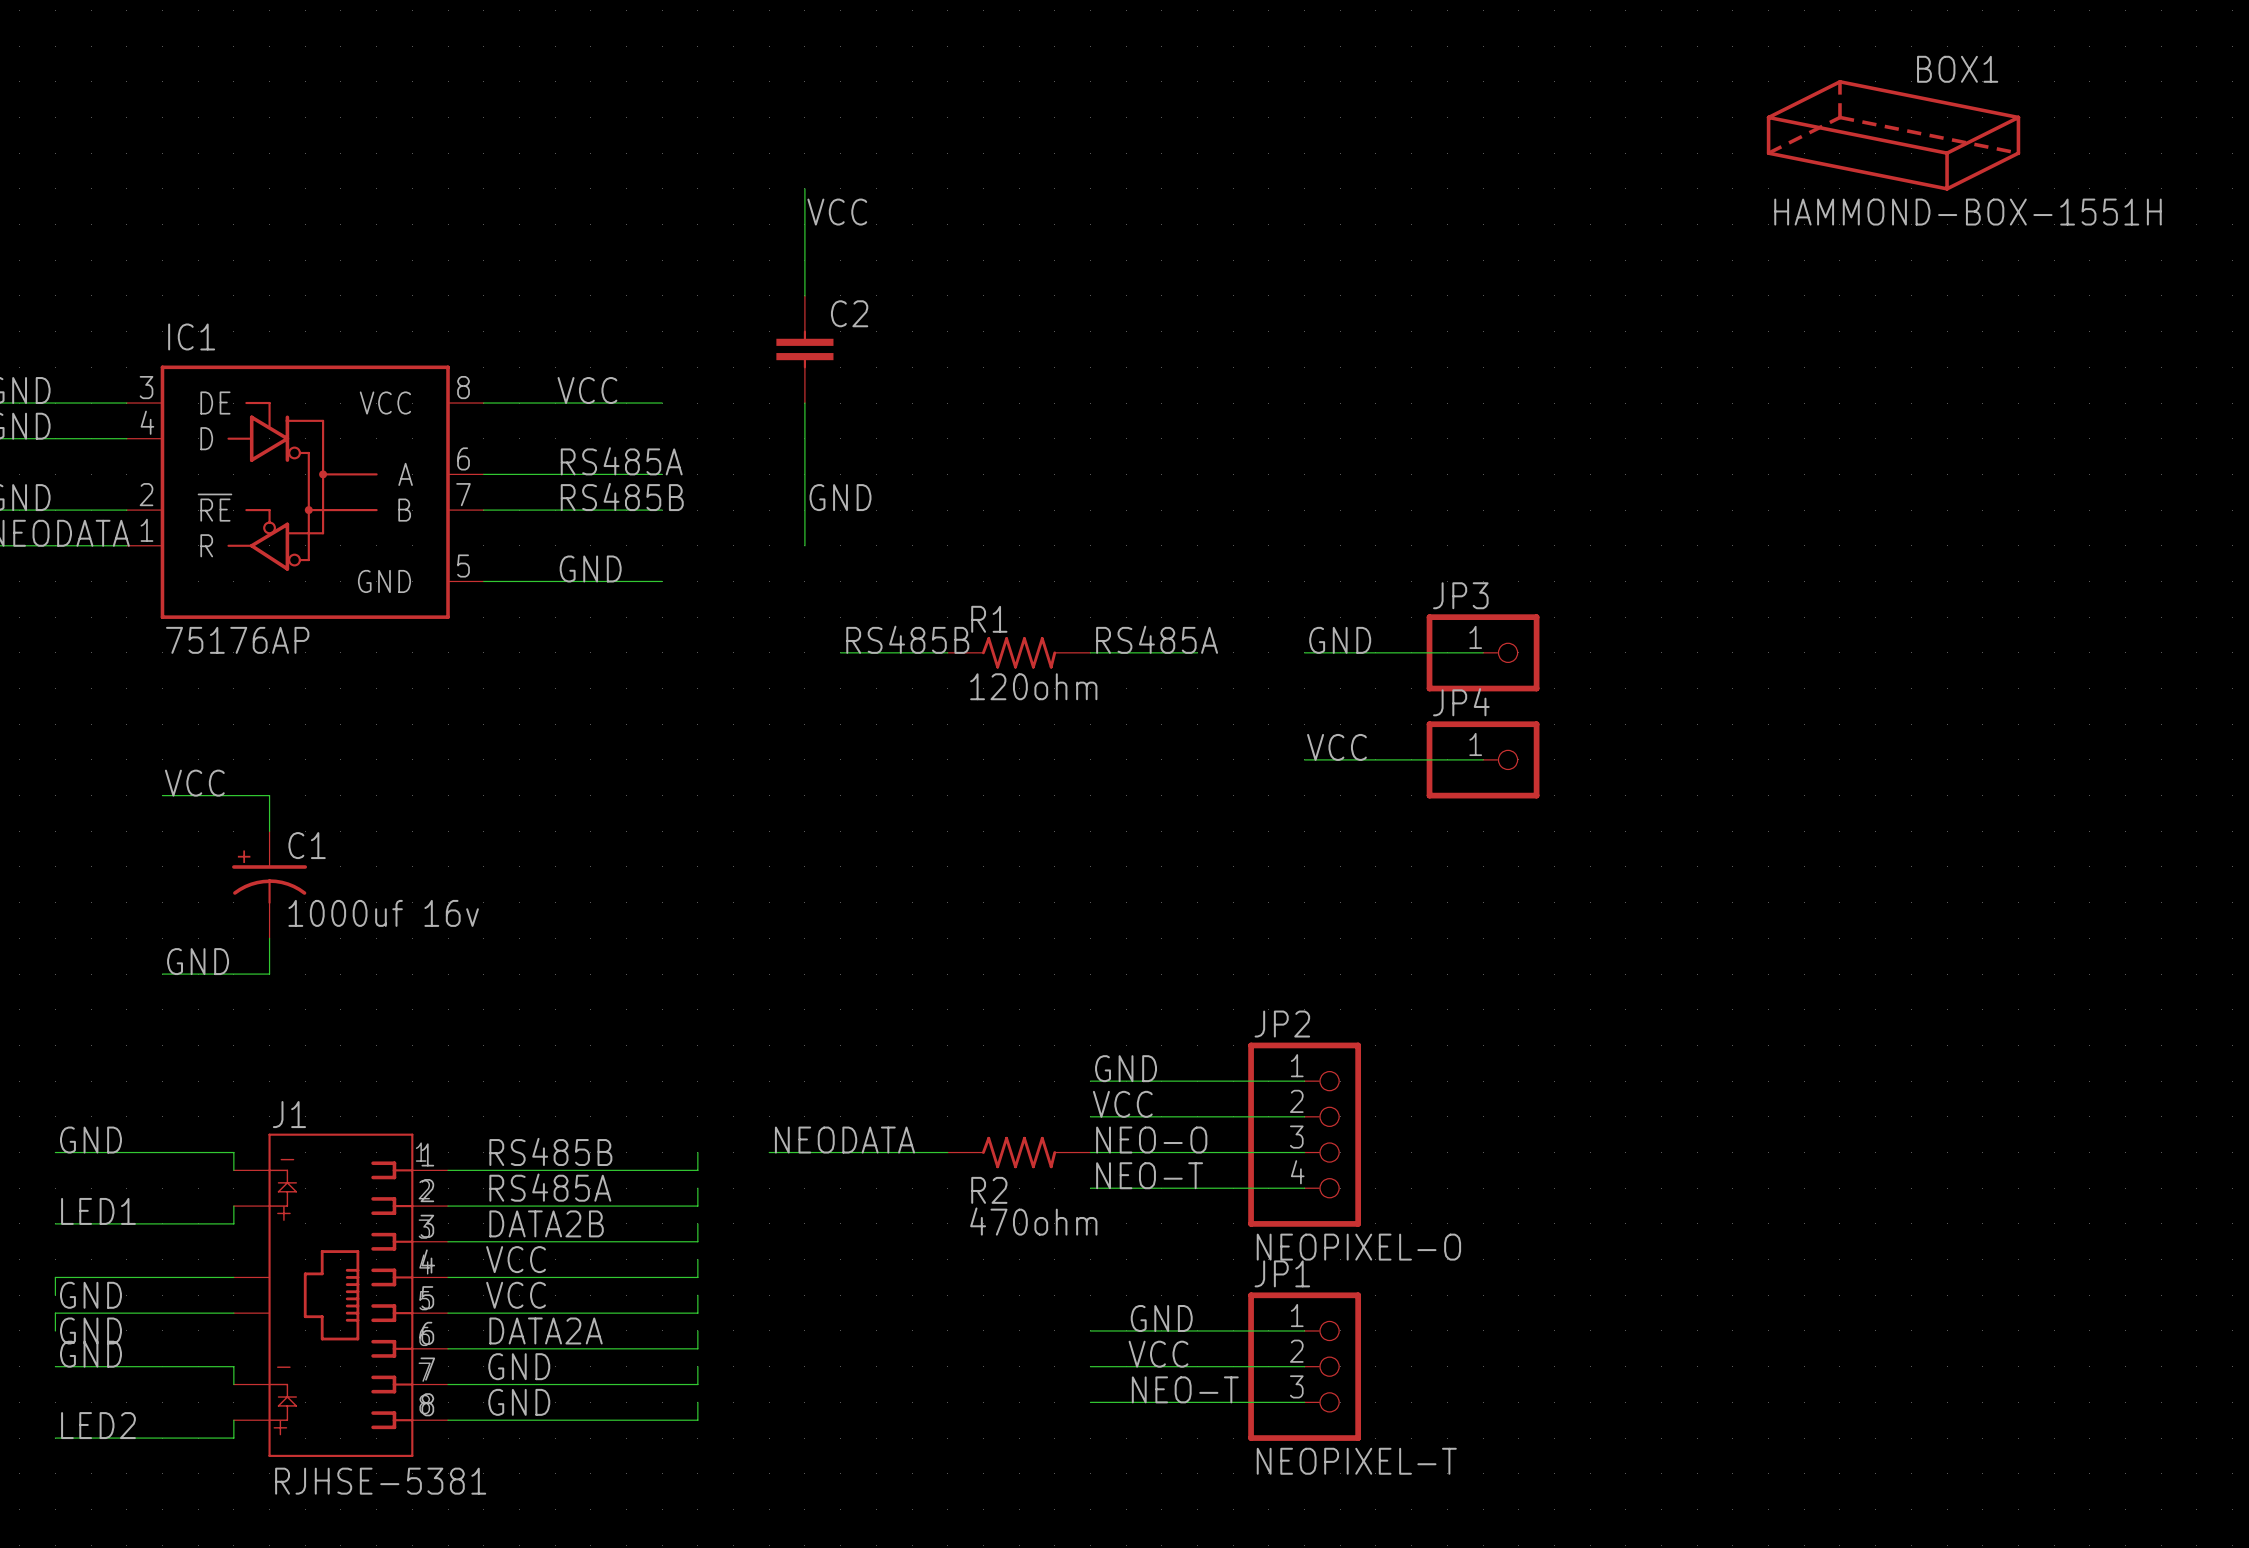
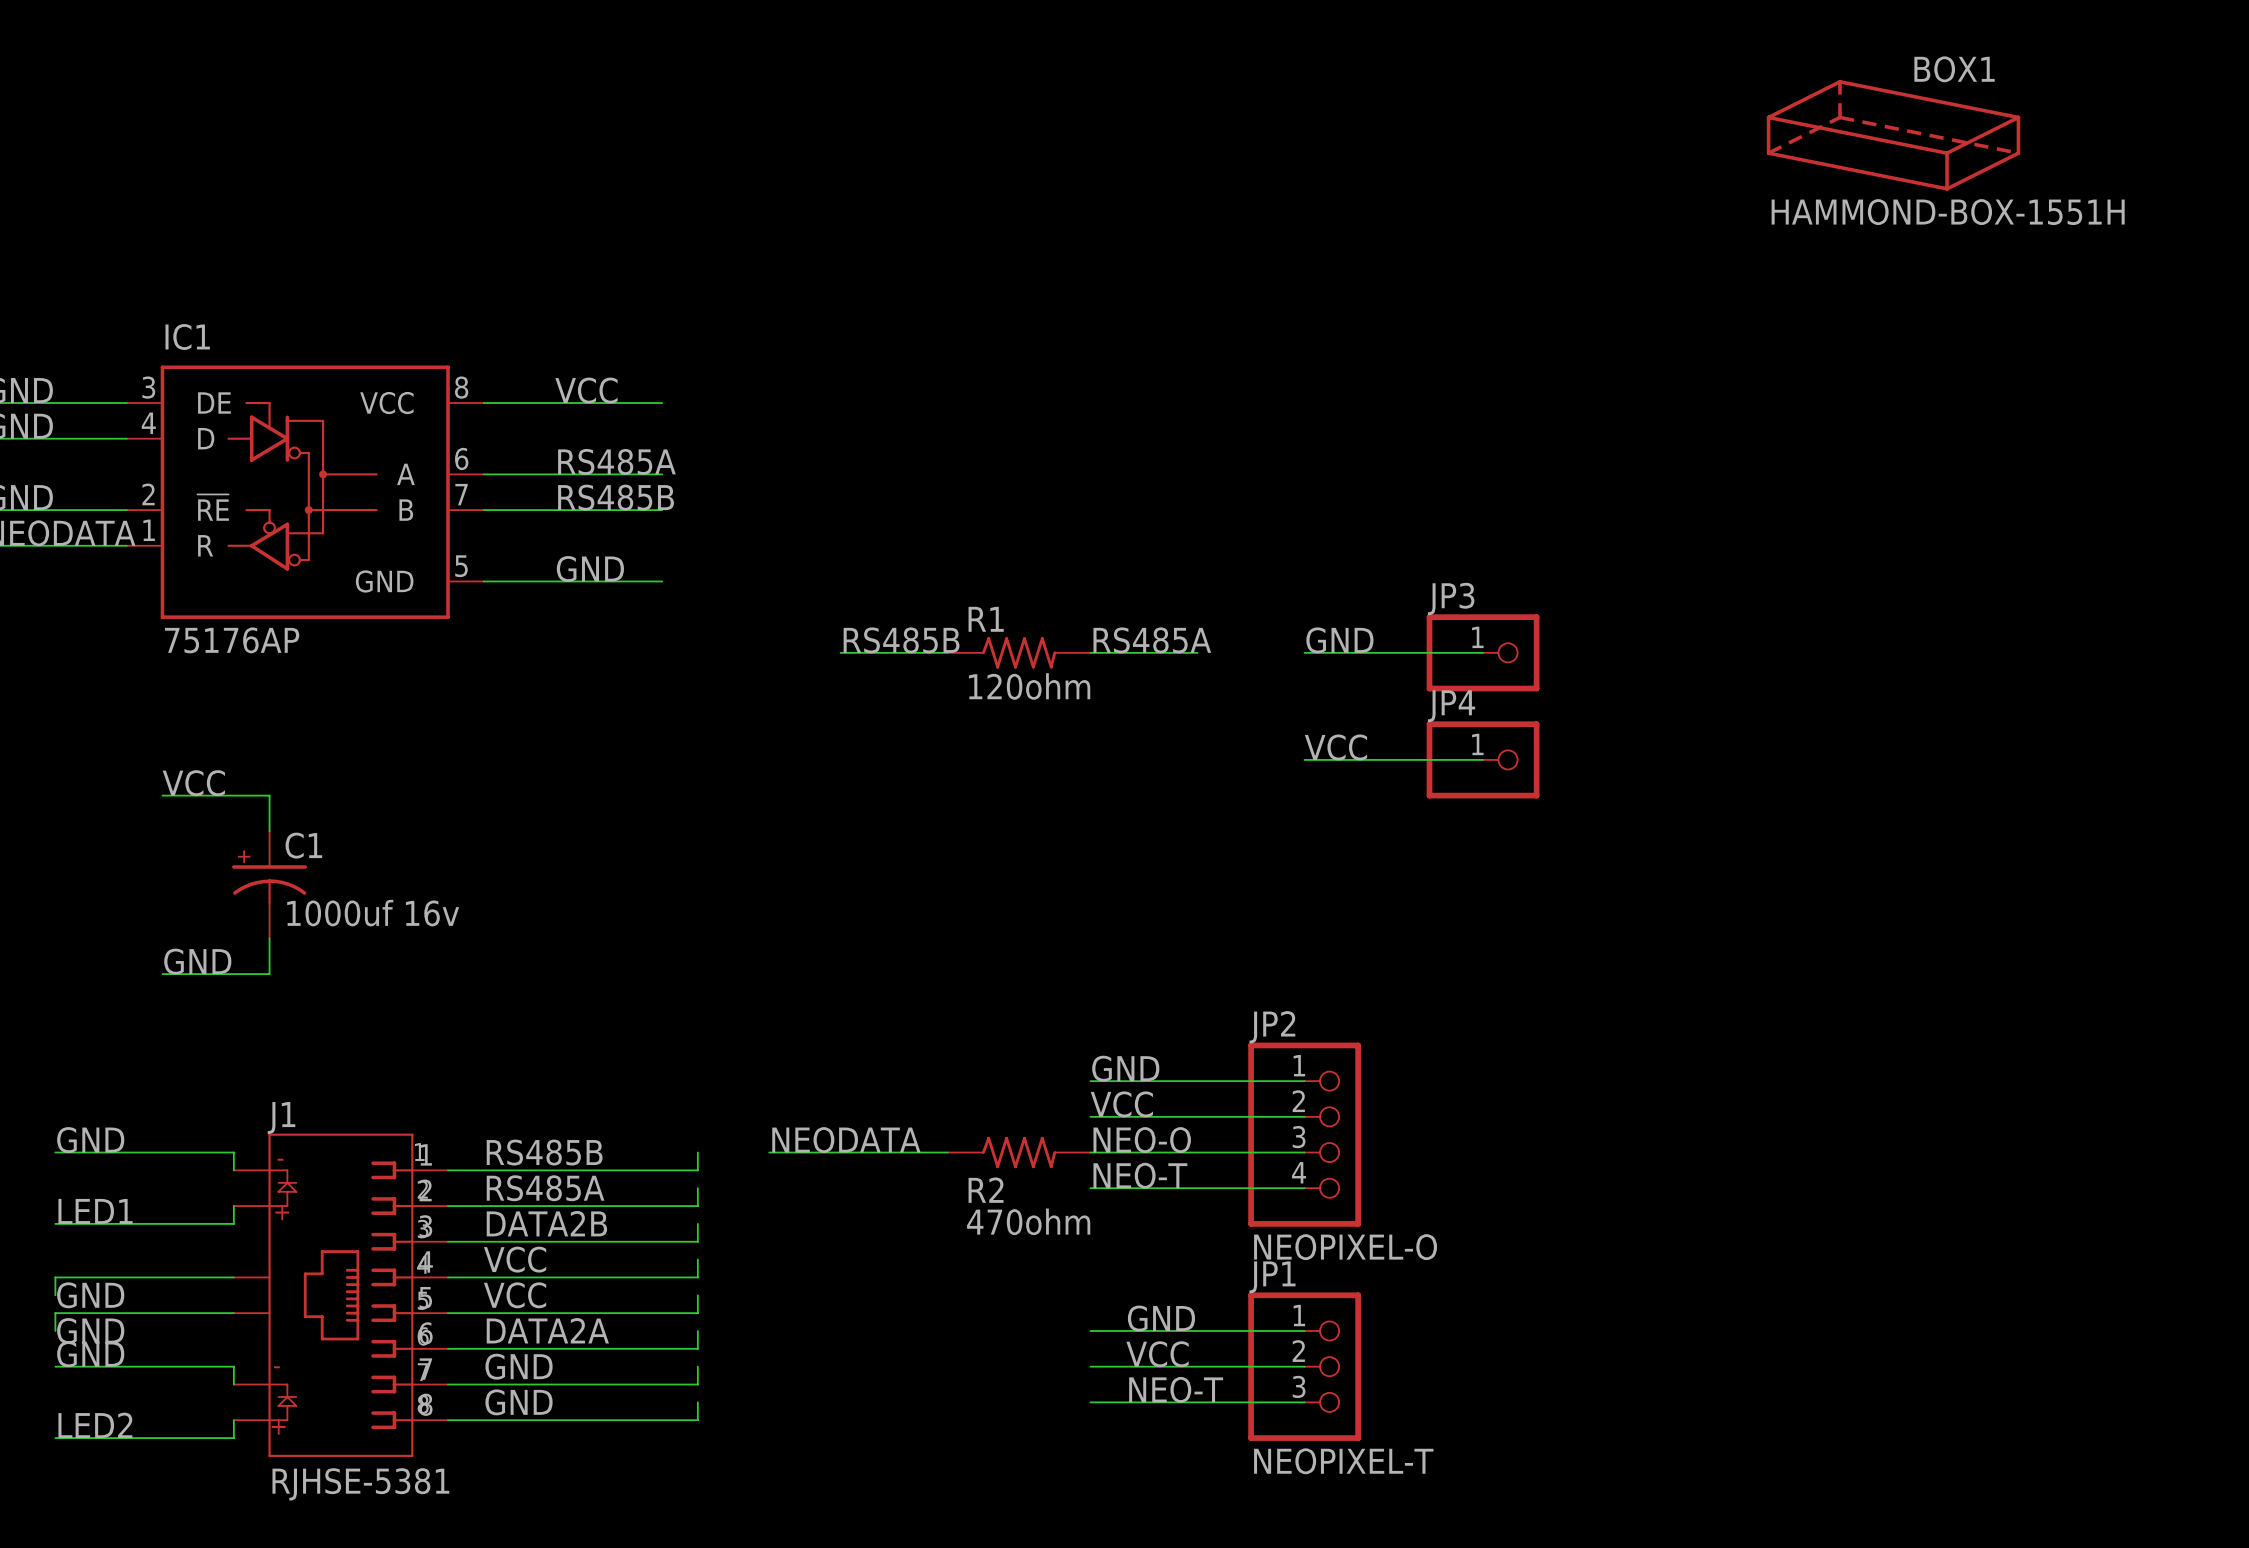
wire: (804, 188) (804, 295) -> none
label: VCC (837, 212) -> none
C2: (804, 349) -> none
wire: (804, 403) (804, 545) -> none
label: GND (840, 497) -> none

